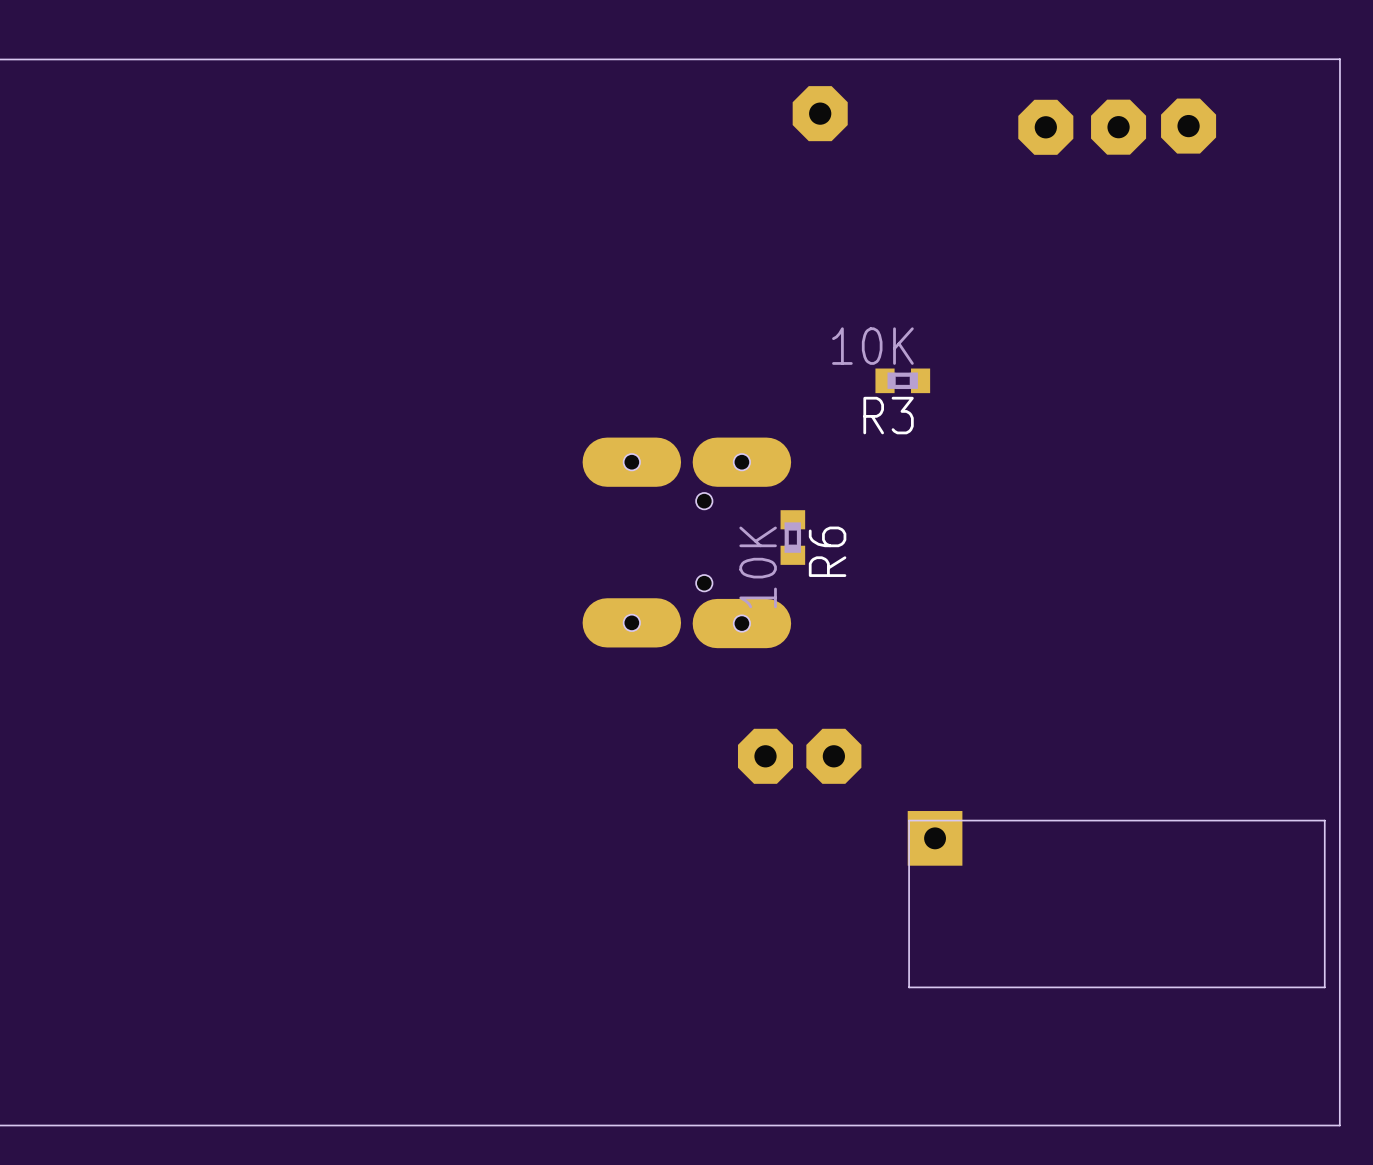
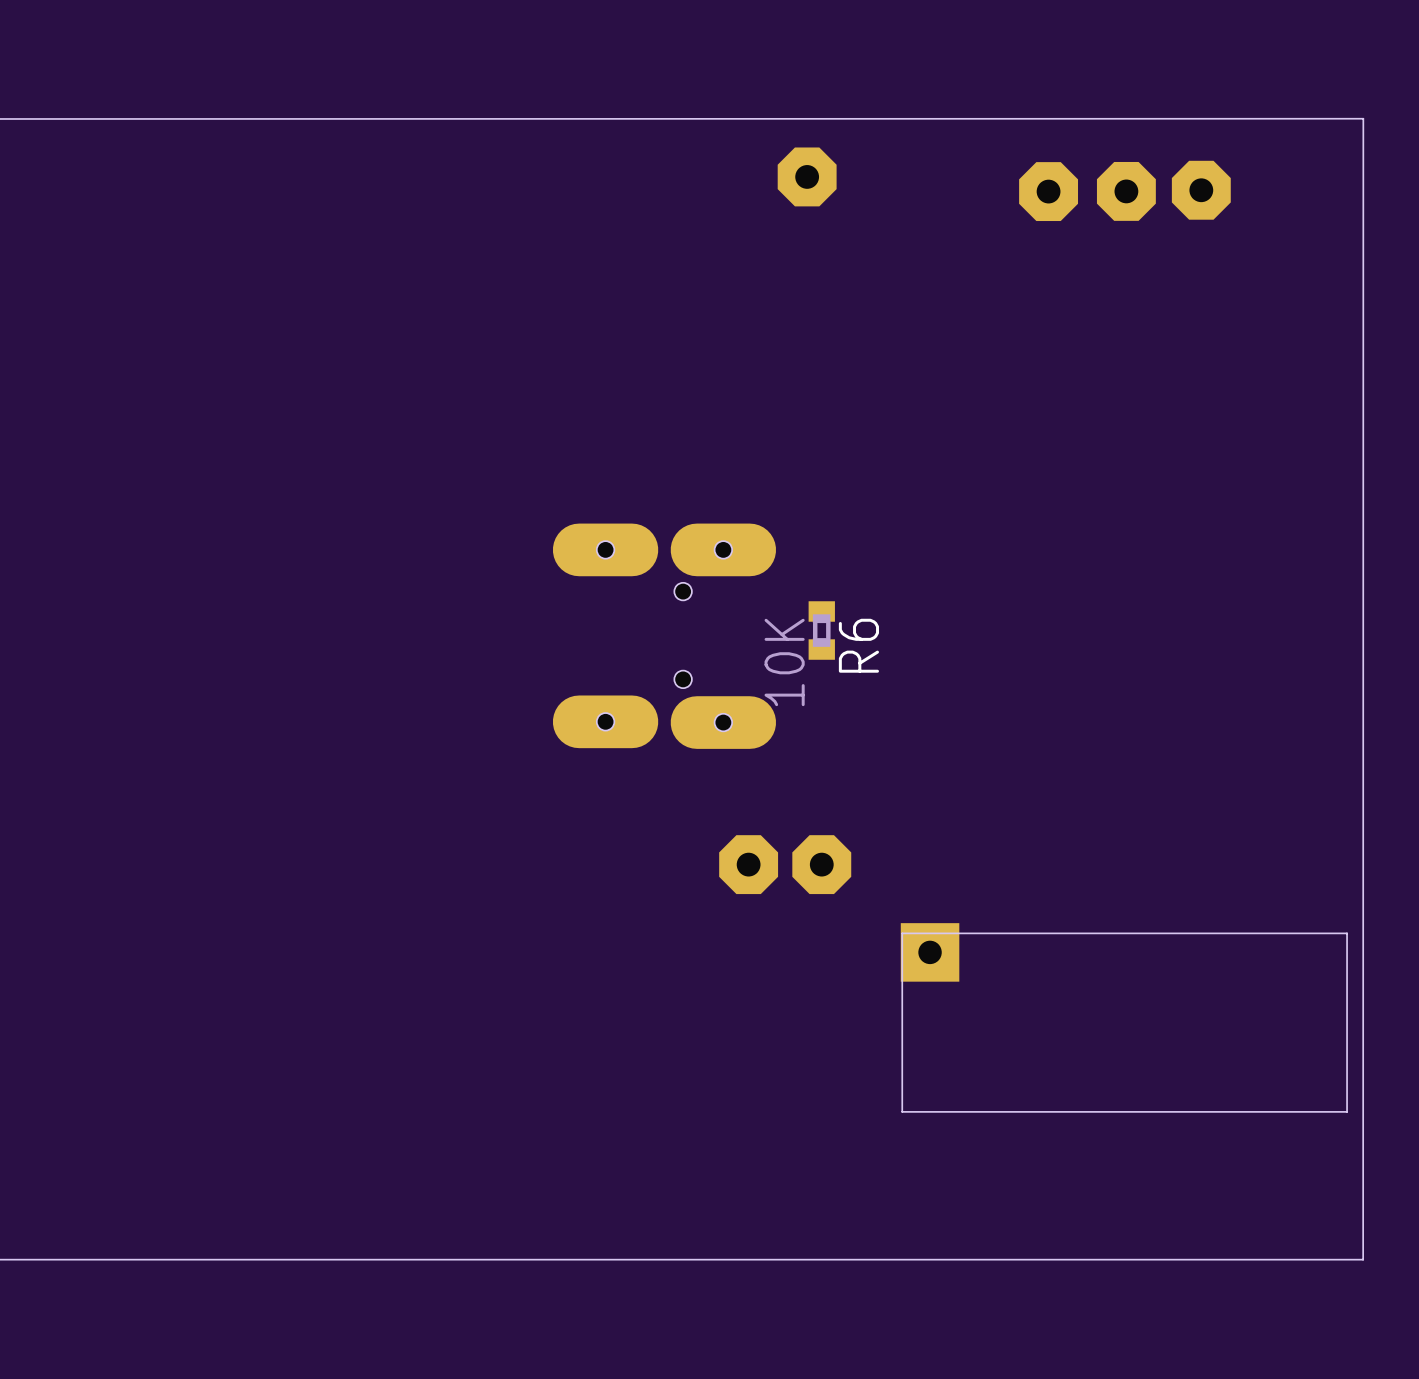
R3: 10K (902, 380) -> none
R6 position: (792, 537) -> (821, 630)

